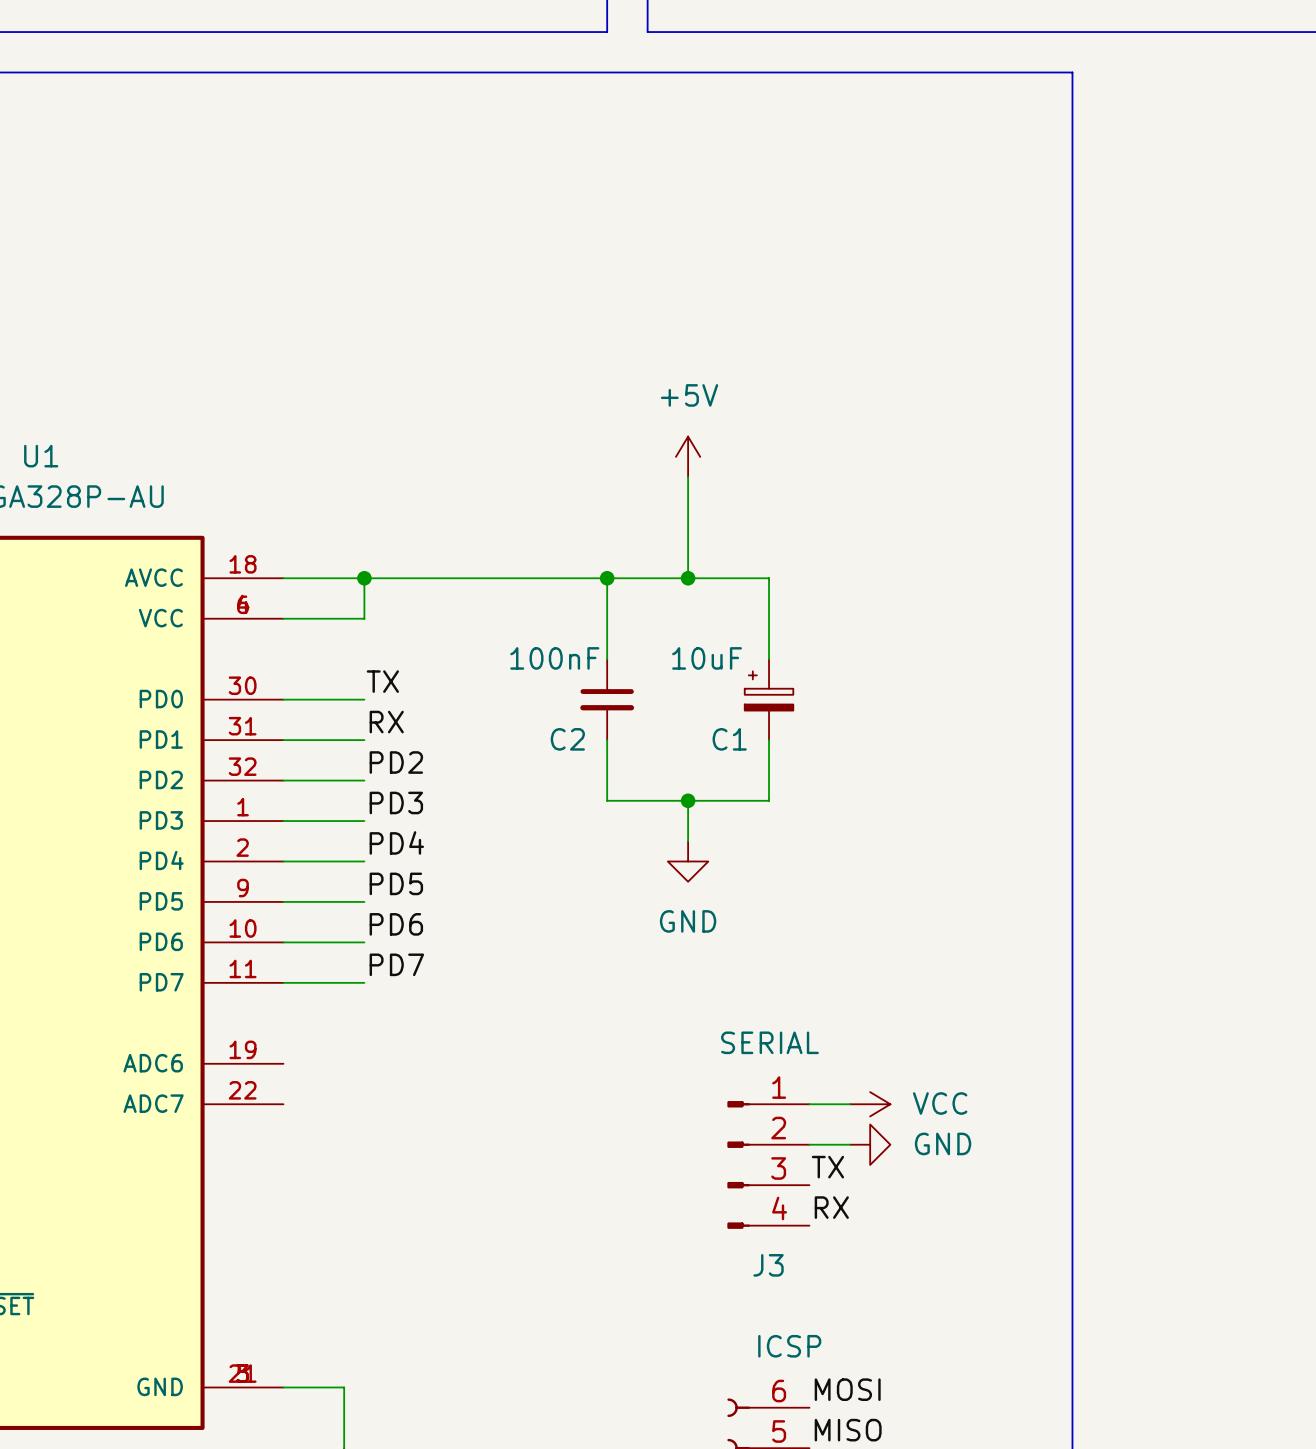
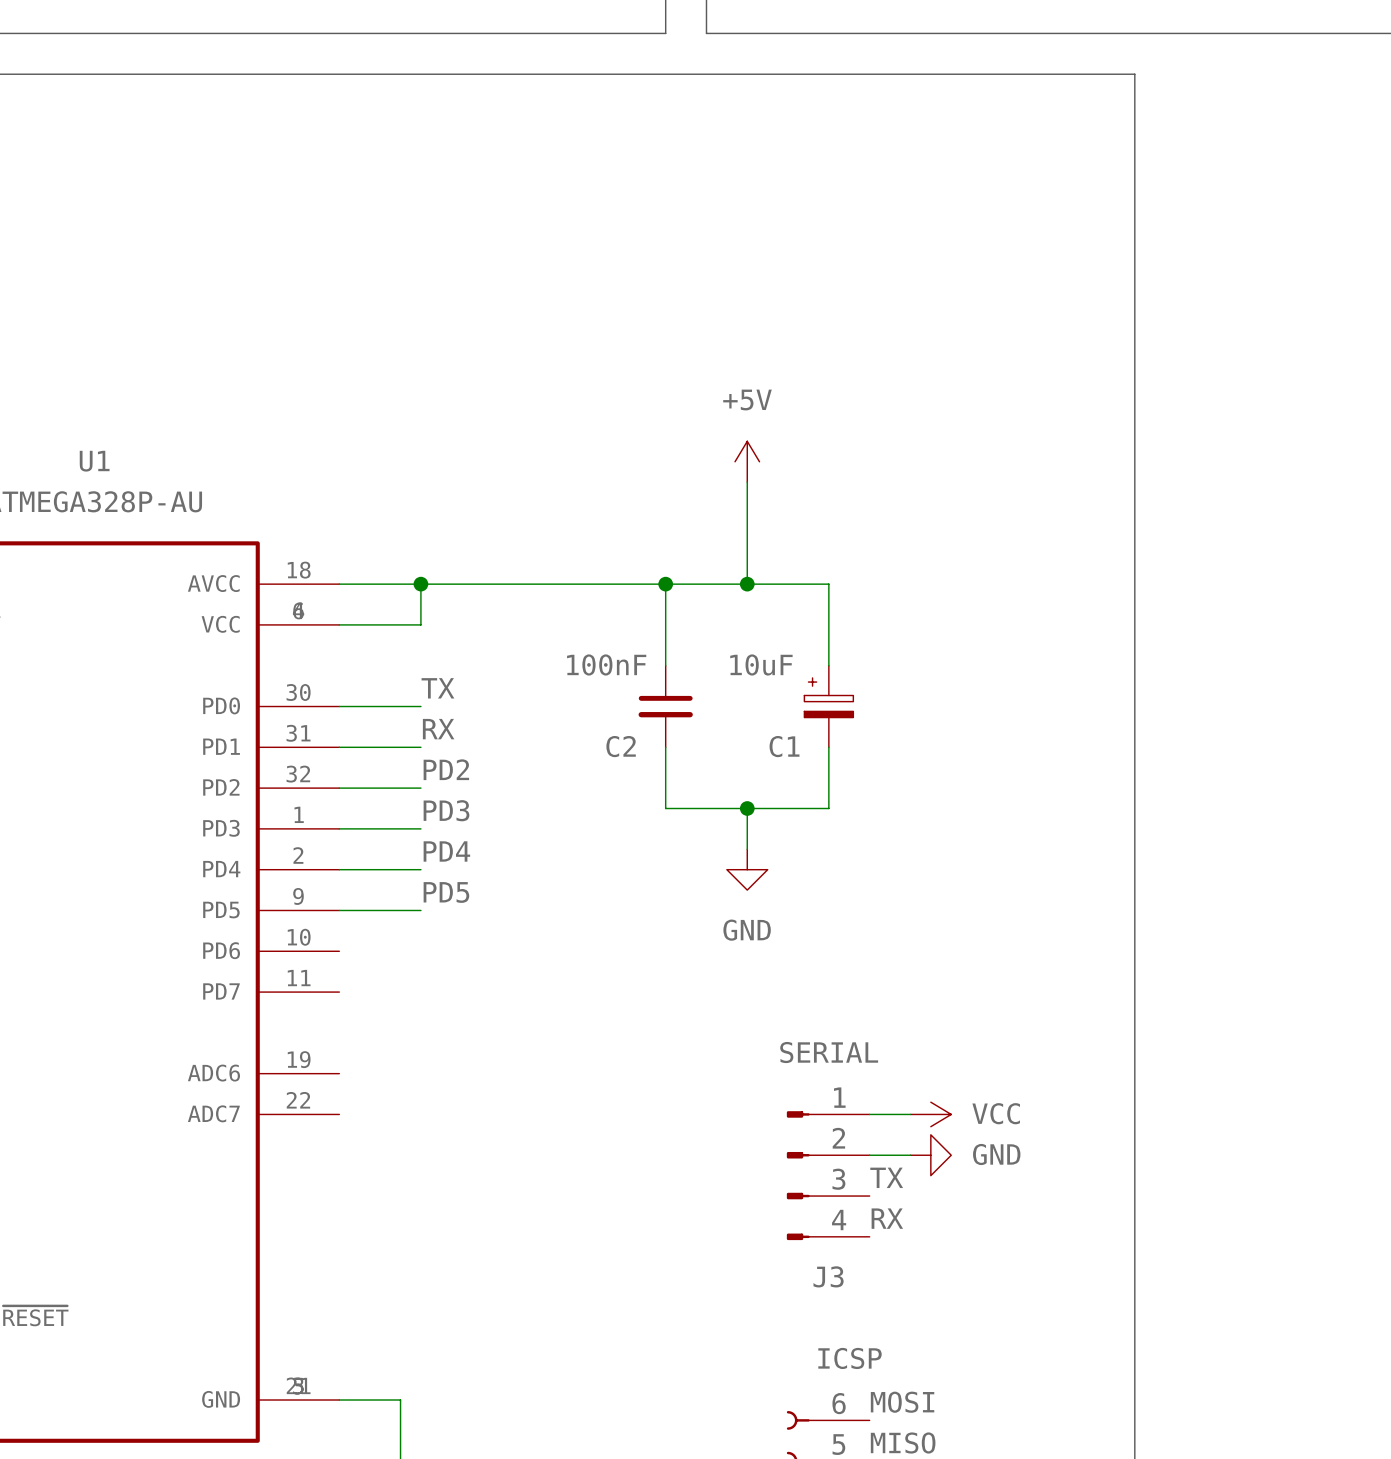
label: PD6 (396, 924) -> none
wire: (283, 942) (364, 942) -> none
label: PD7 (396, 964) -> none
wire: (283, 982) (364, 982) -> none

